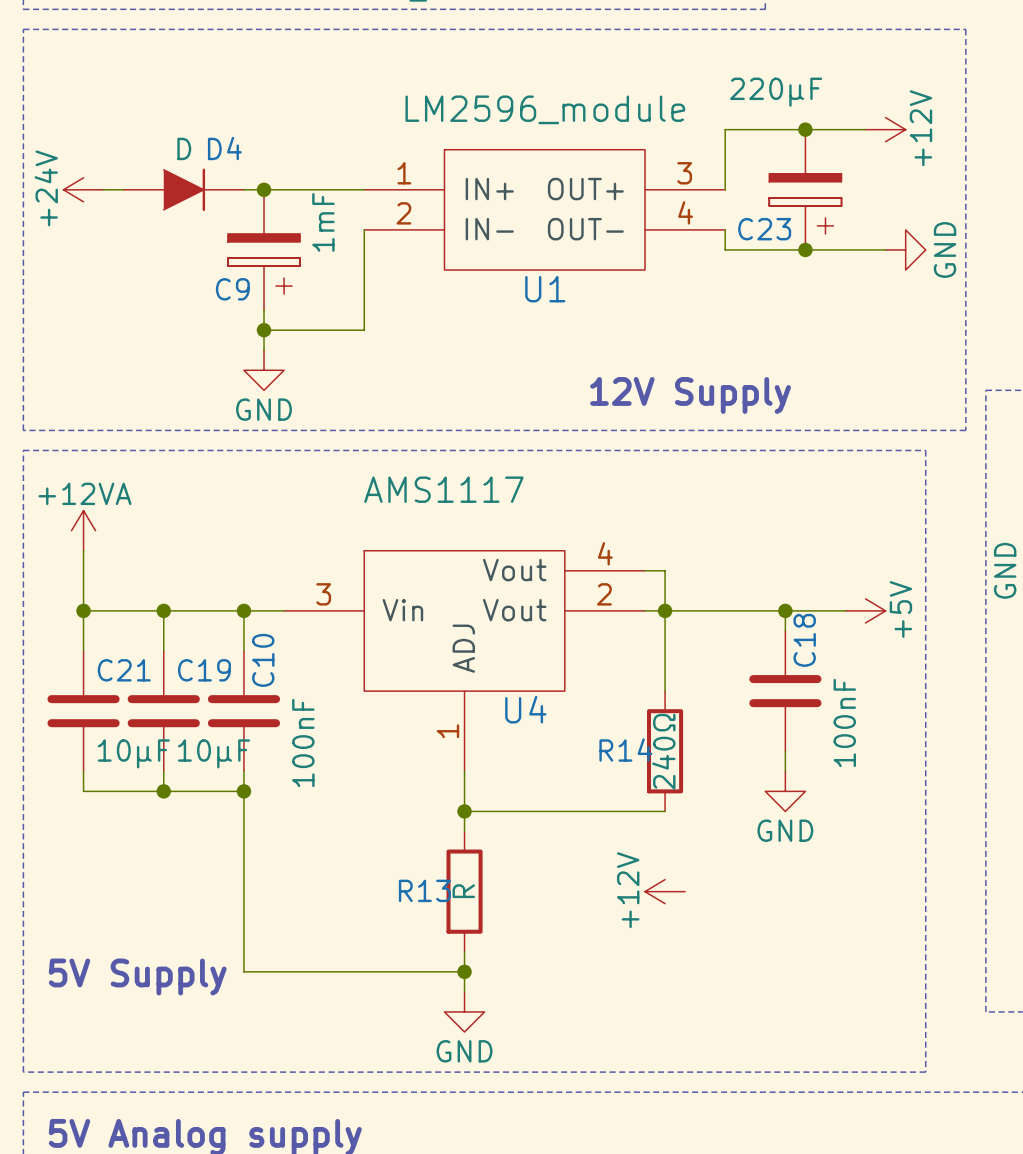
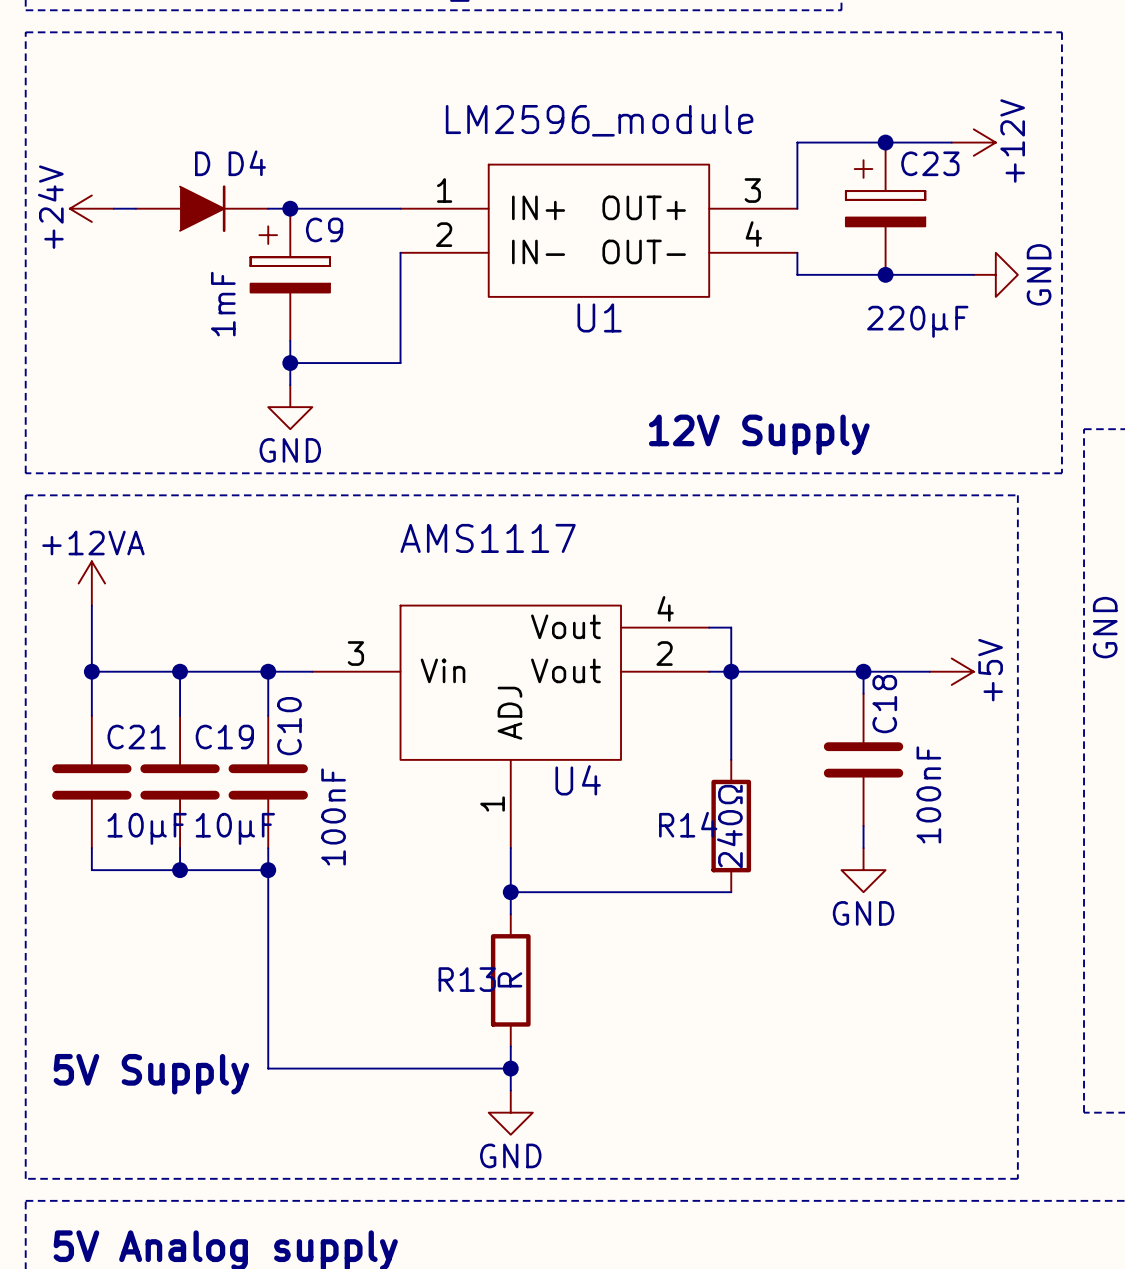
C23 rotation: 0° (805, 203) -> 180° (885, 193)
C9 rotation: 0° (264, 264) -> 180° (290, 259)
power symbol: +12V (665, 891) -> none

